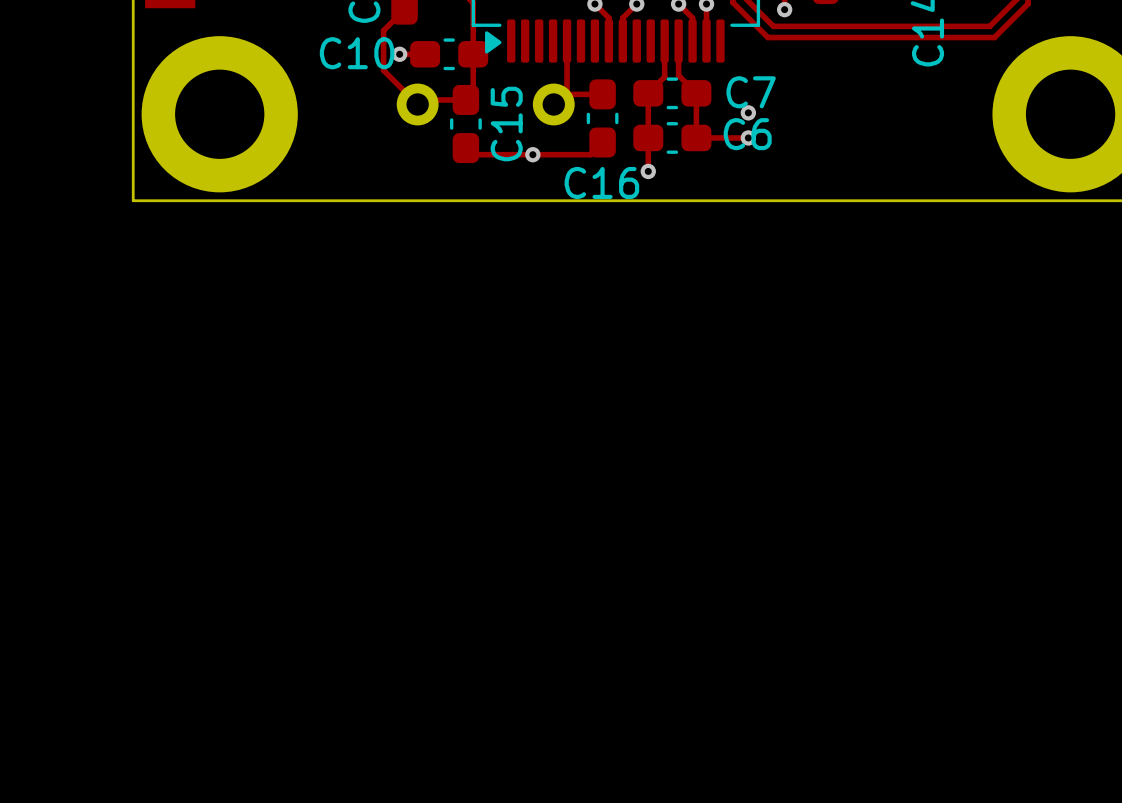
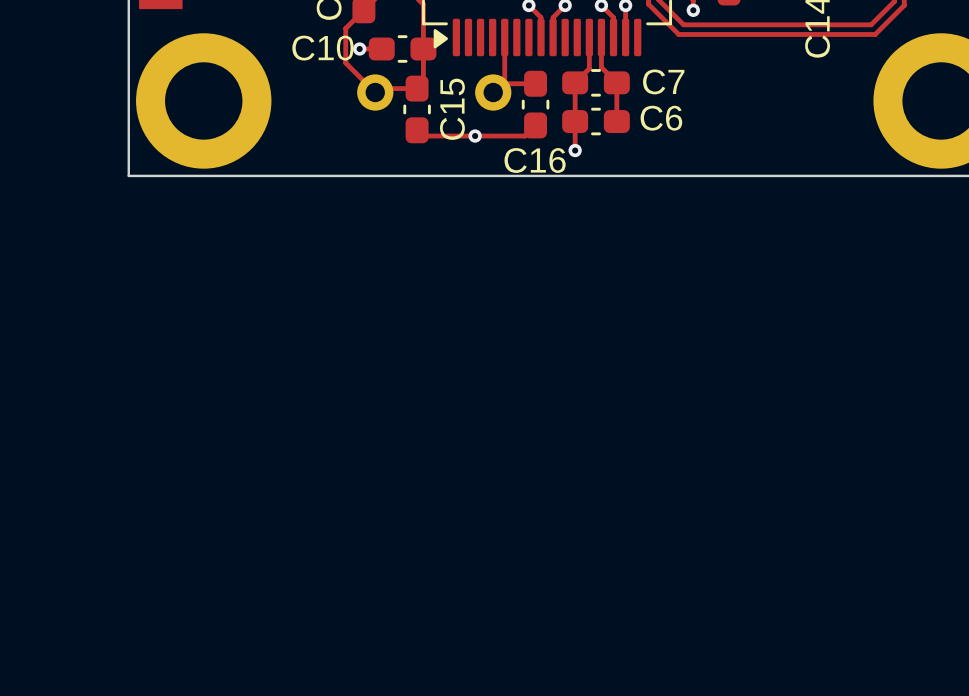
via: (748, 112) -> none
track: (696, 137) (748, 137) -> none
via: (748, 137) -> none

